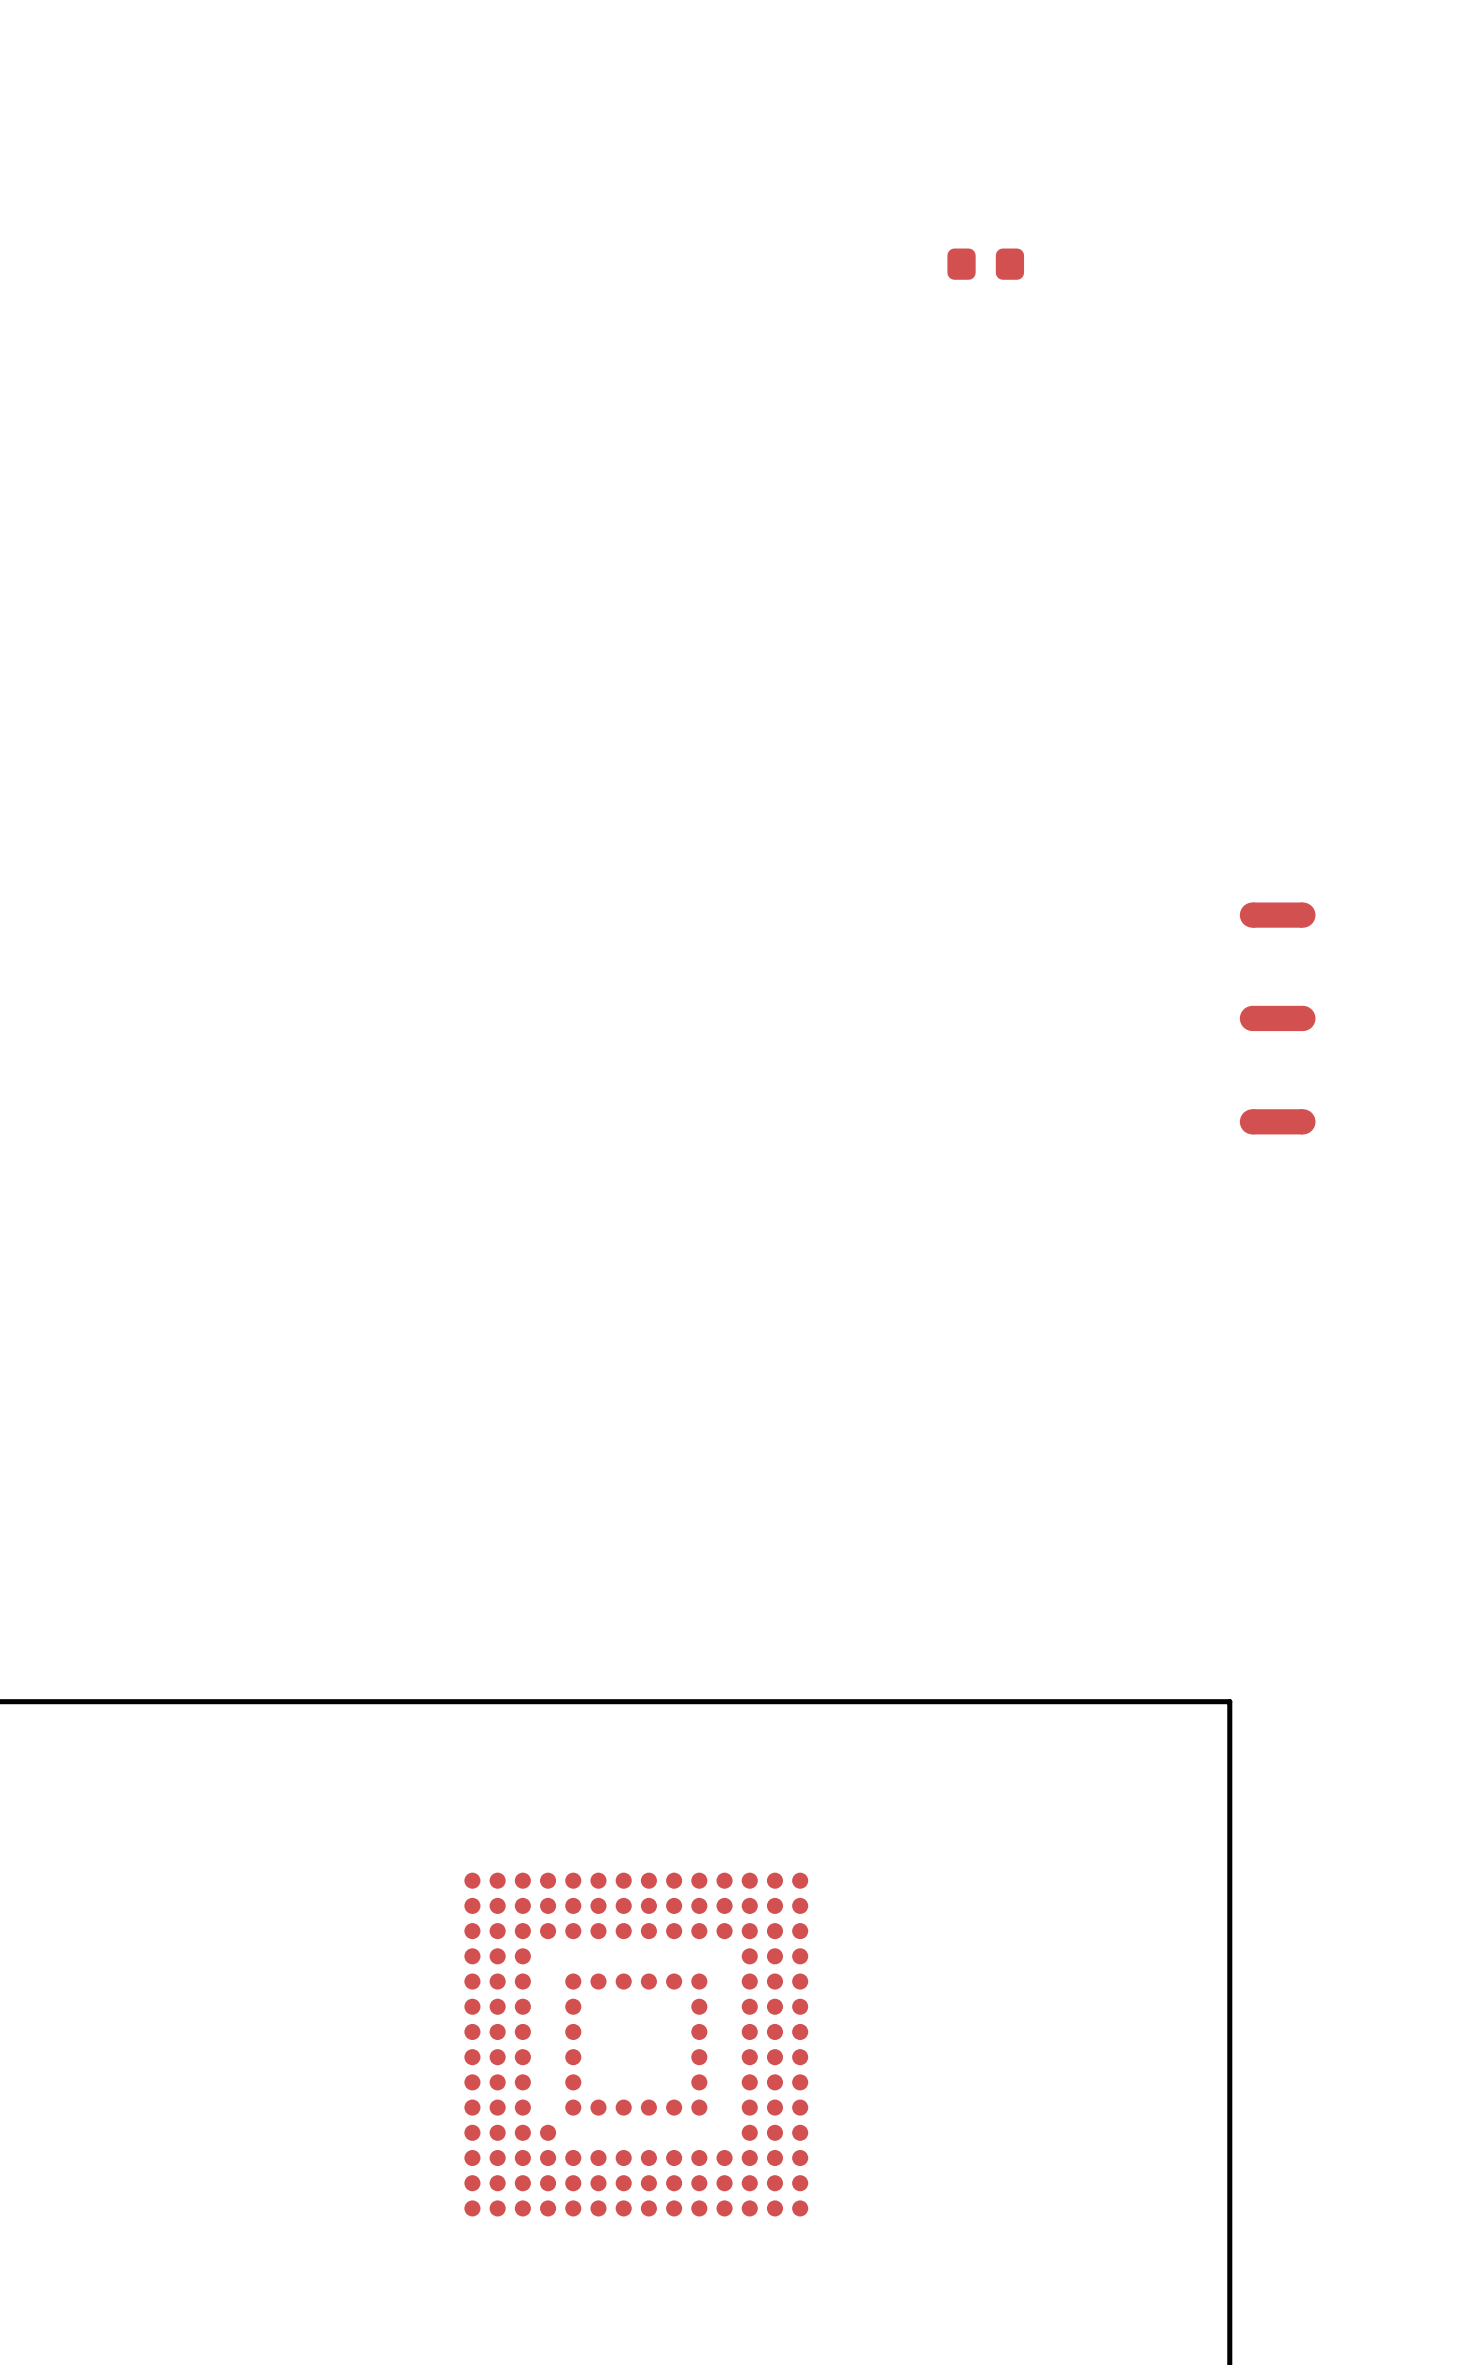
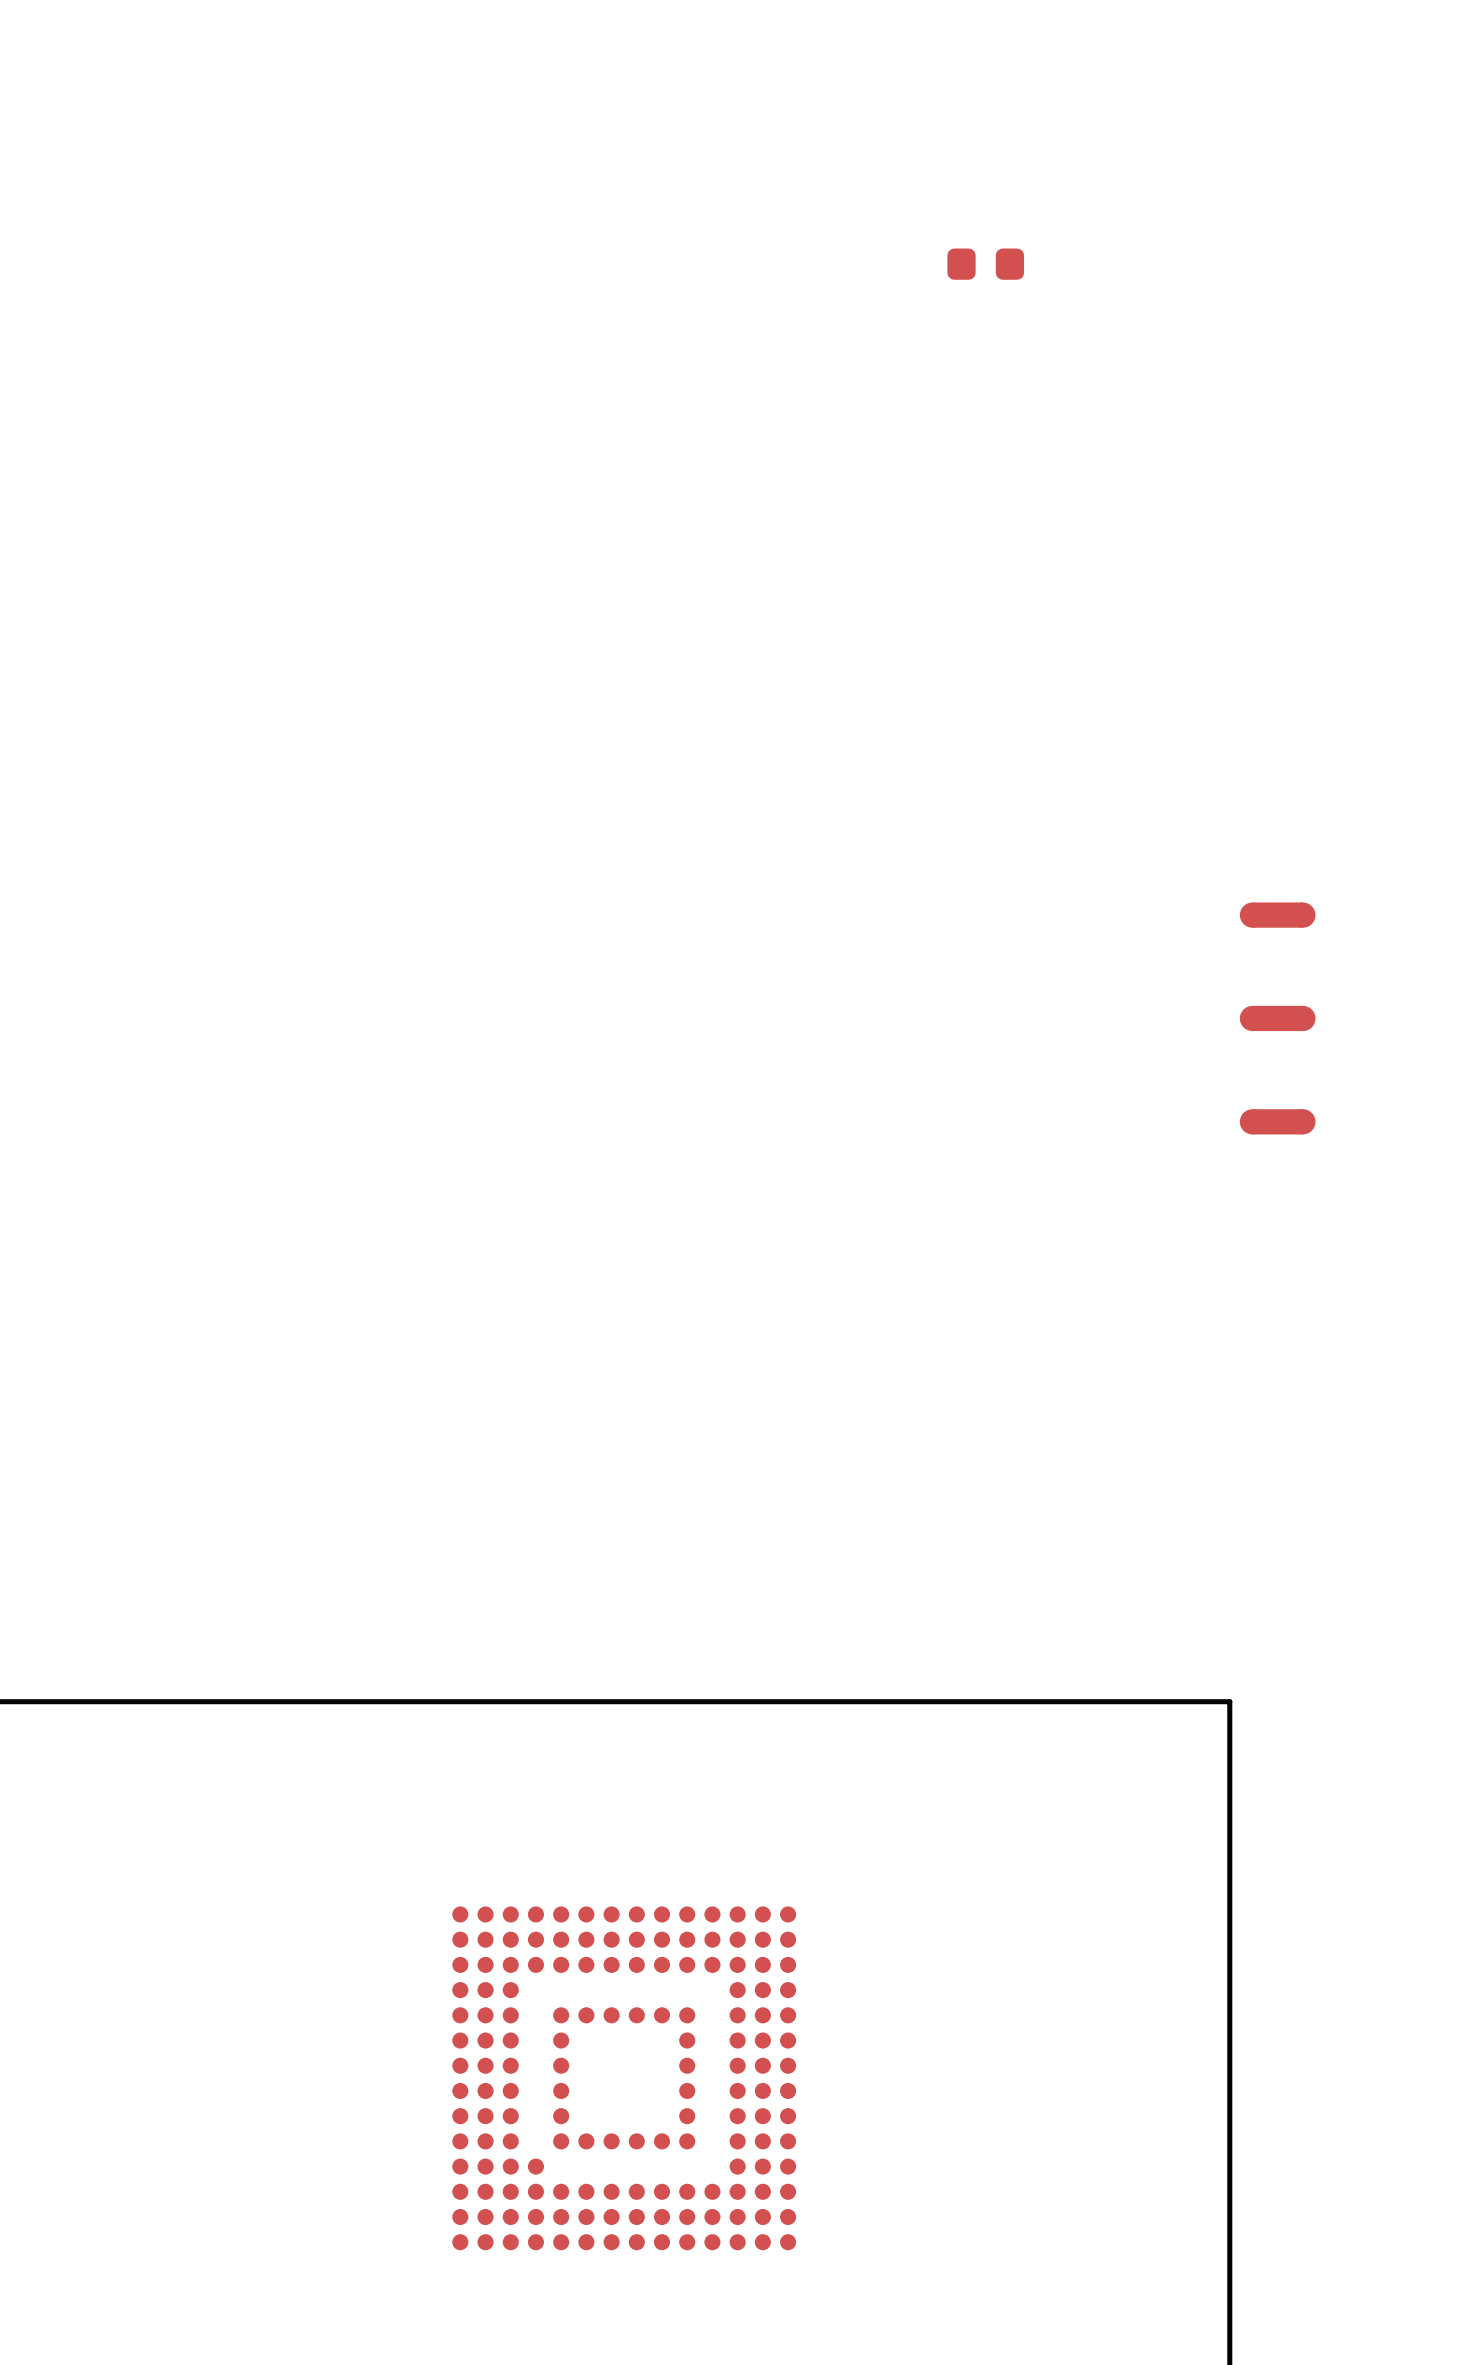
part position: (636, 2044) -> (624, 2078)

